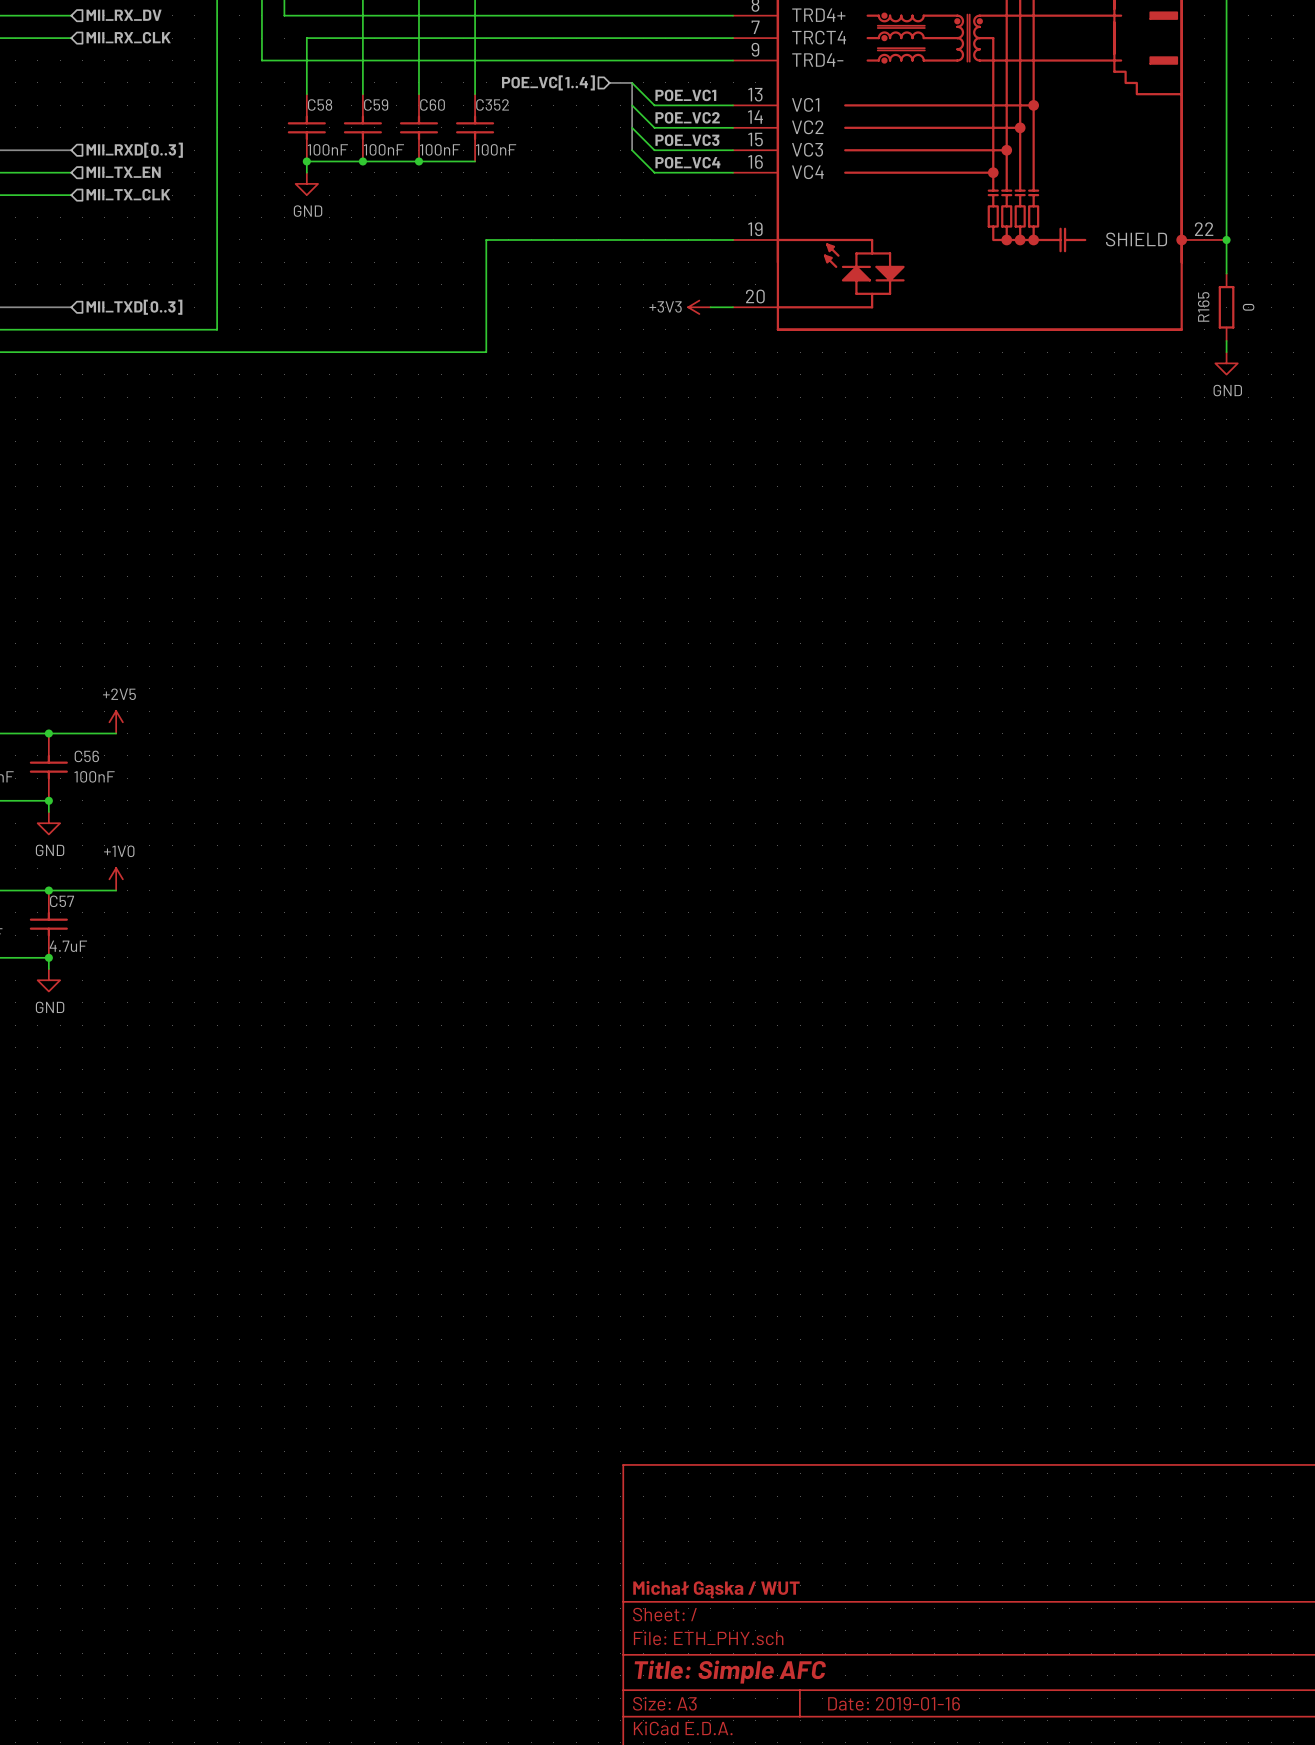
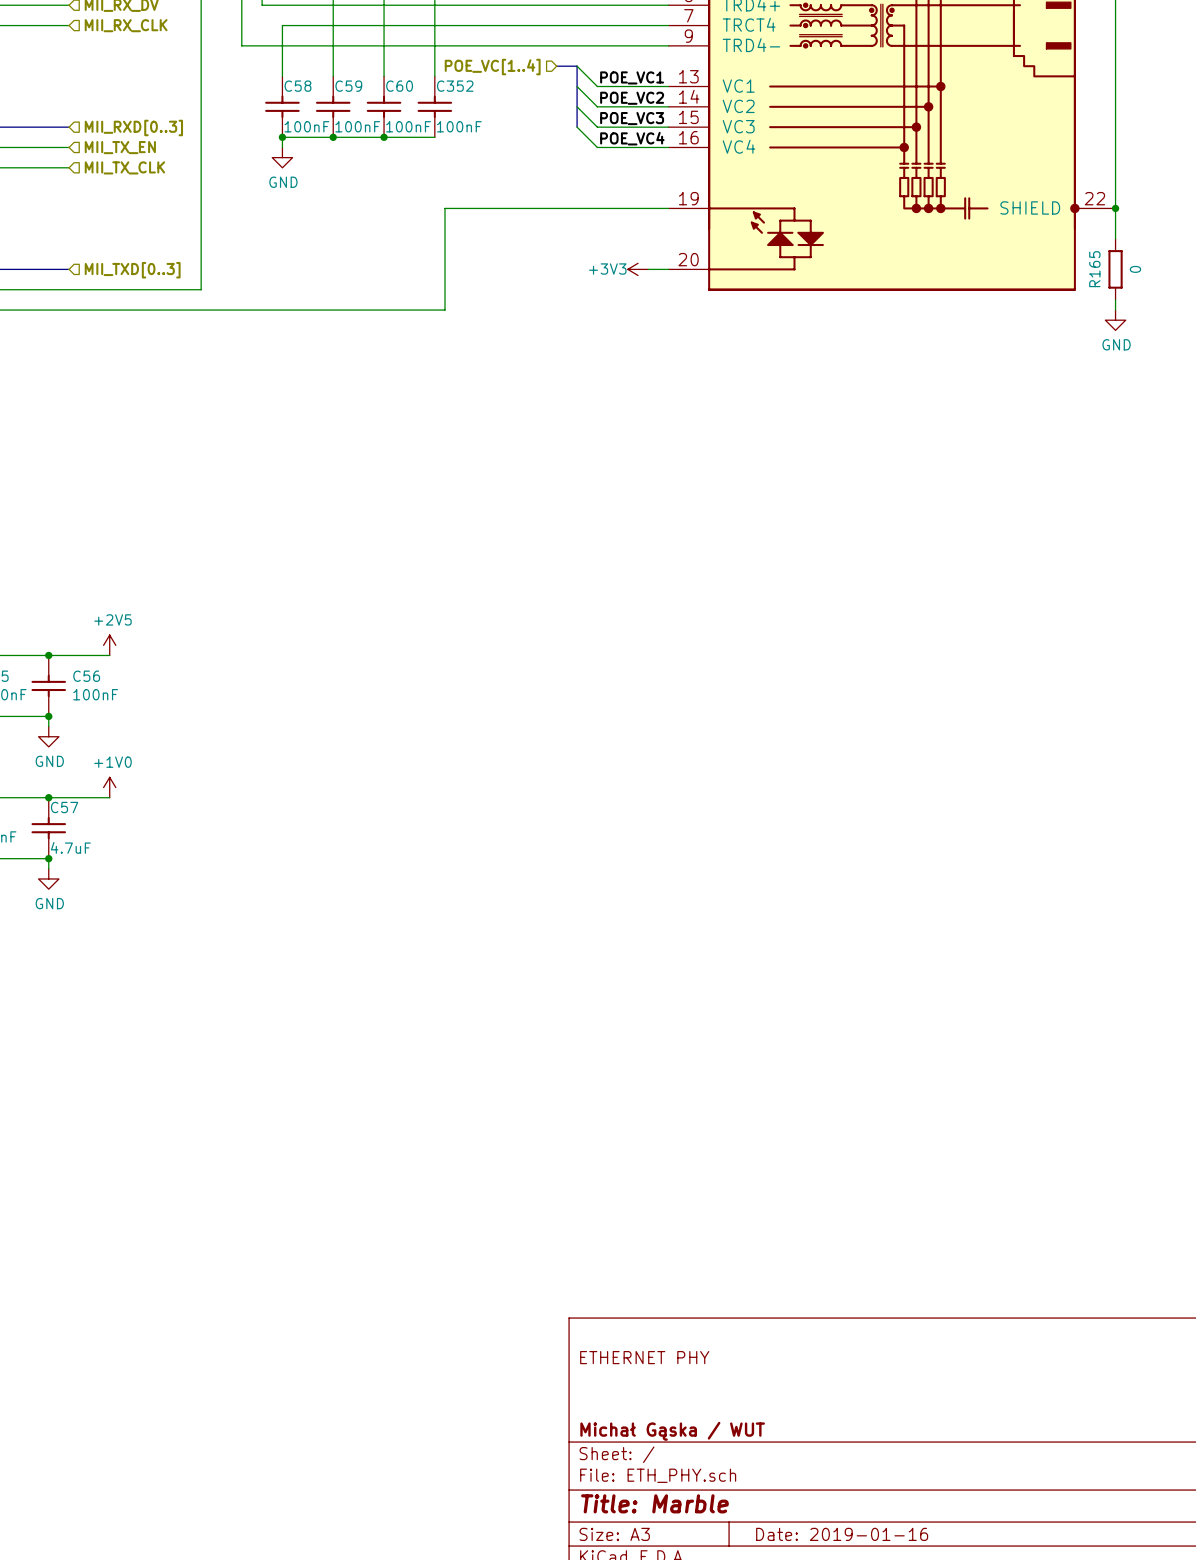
title block: none -> ETHERNET PHY (644, 1357)
title block: Title: Simple AFC (730, 1672) -> Title: Marble (654, 1503)

